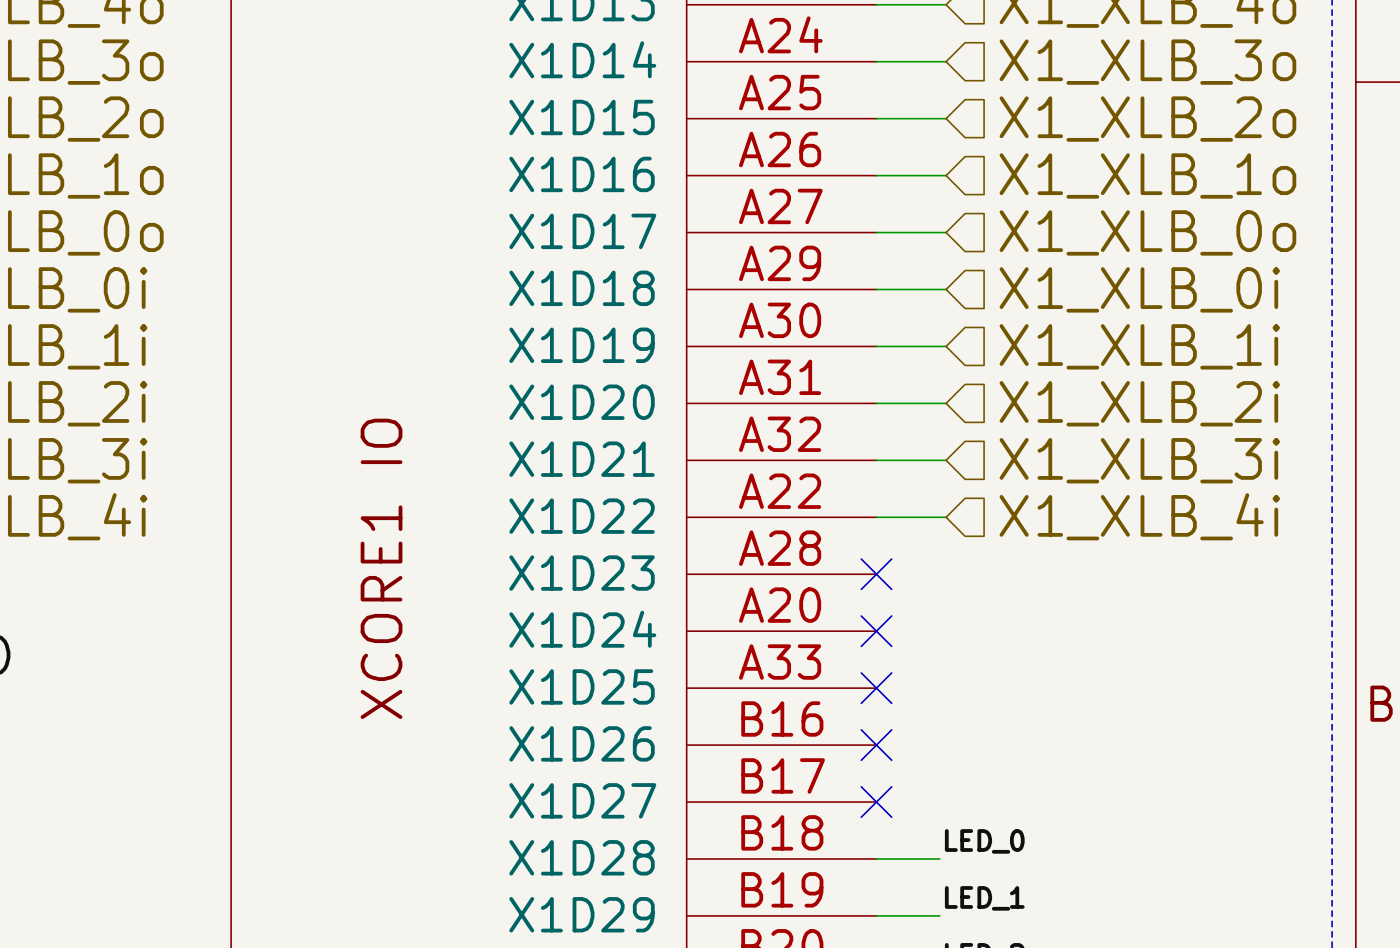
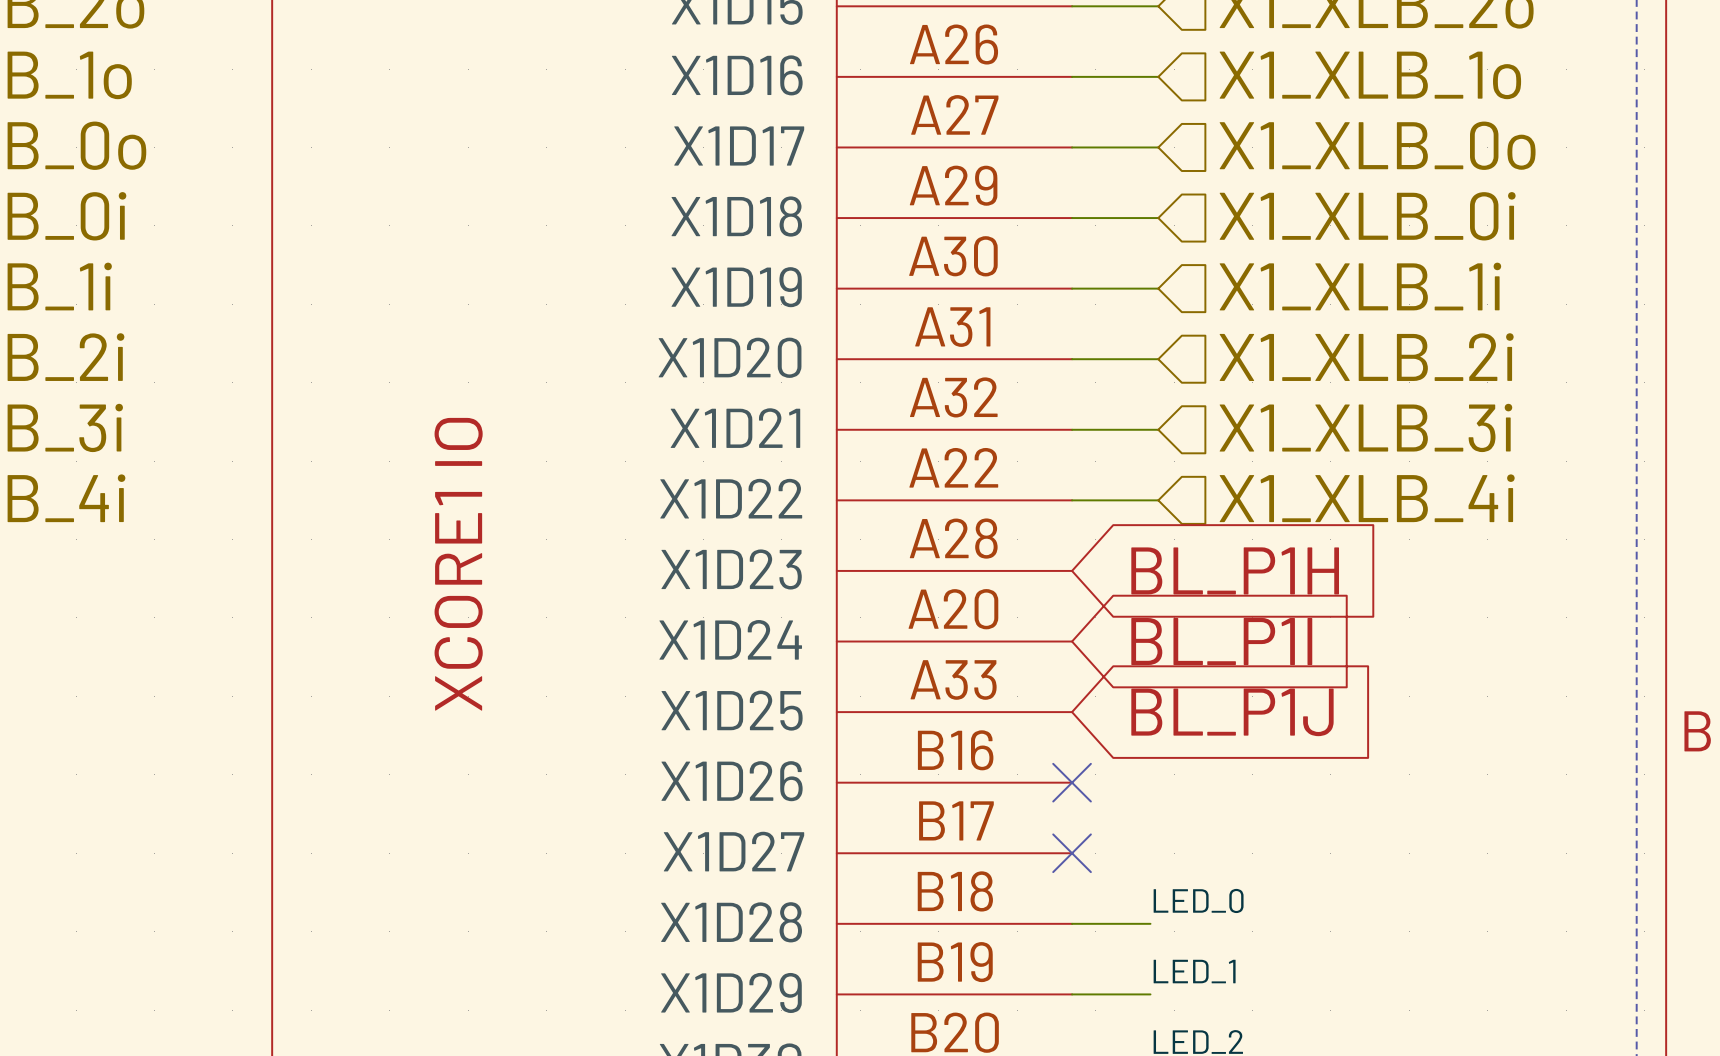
no-connect mark: (876, 574) -> none
global label: none -> BL_P1H (1235, 570)
no-connect mark: (876, 631) -> none
global label: none -> BL_P1I (1221, 641)
no-connect mark: (876, 688) -> none
global label: none -> BL_P1J (1232, 712)

